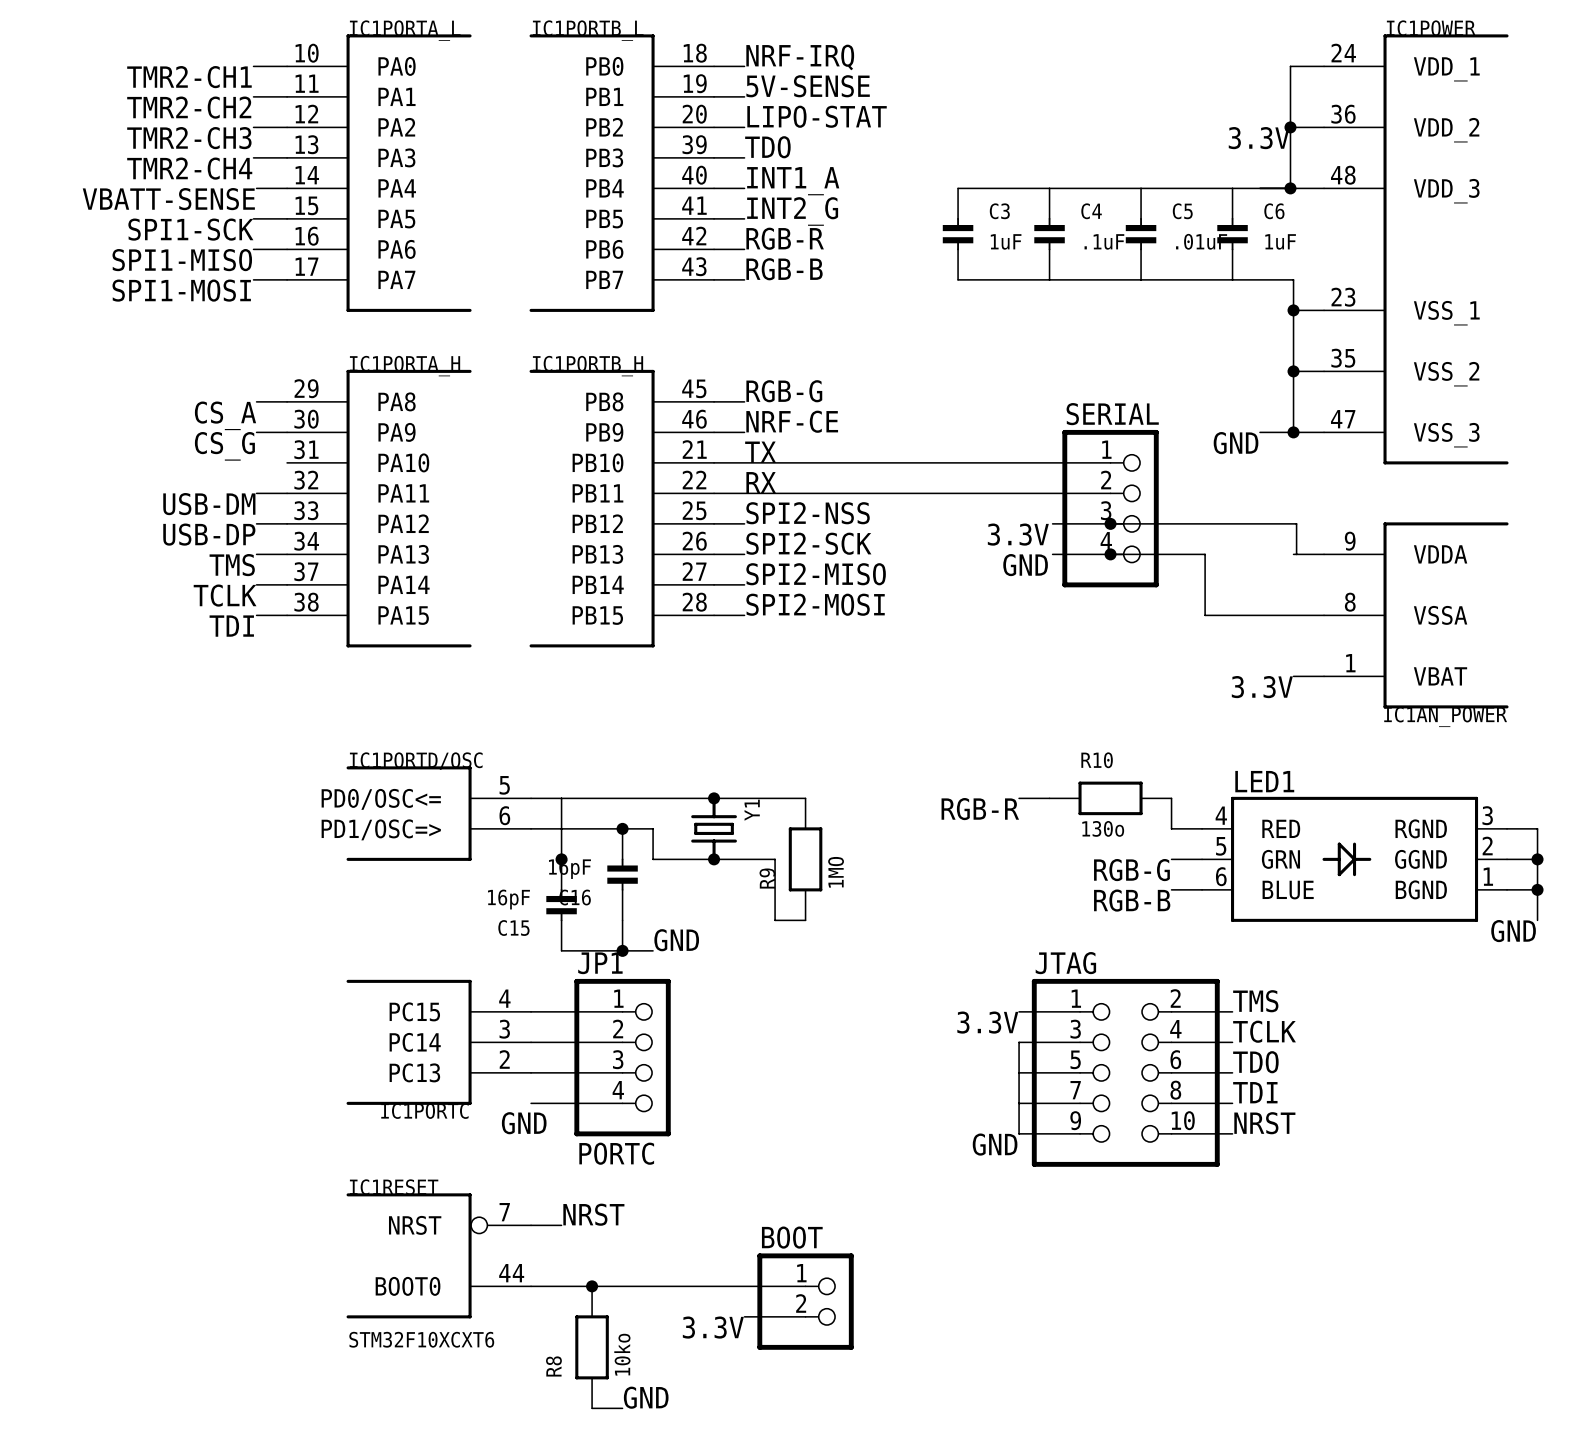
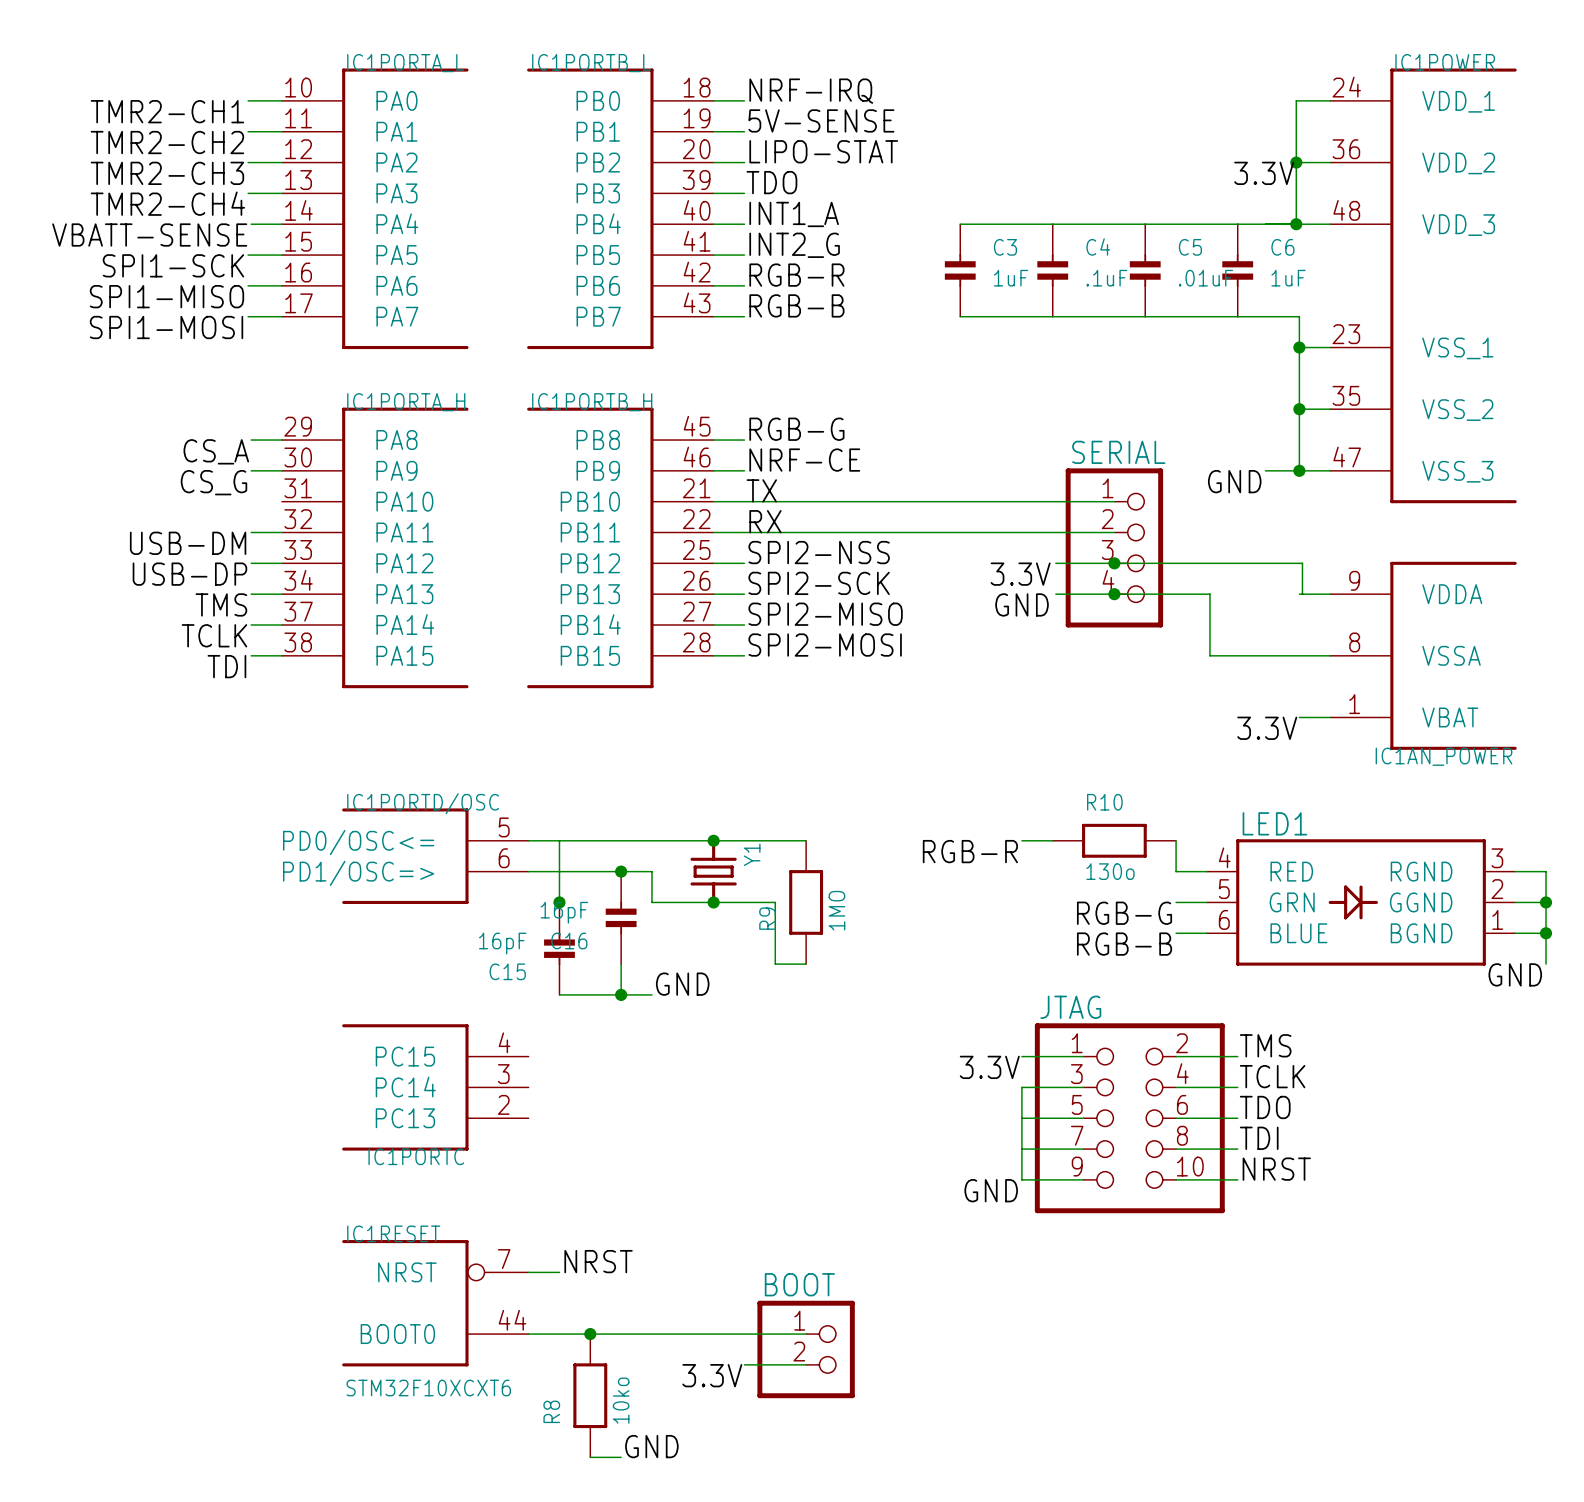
wire: (531, 1011) (622, 1011) -> none
wire: (531, 1042) (622, 1042) -> none
JP1: PORTC (622, 1057) -> none
wire: (531, 1072) (622, 1072) -> none
wire: (531, 1103) (622, 1103) -> none
label: GND (524, 1123) -> none

